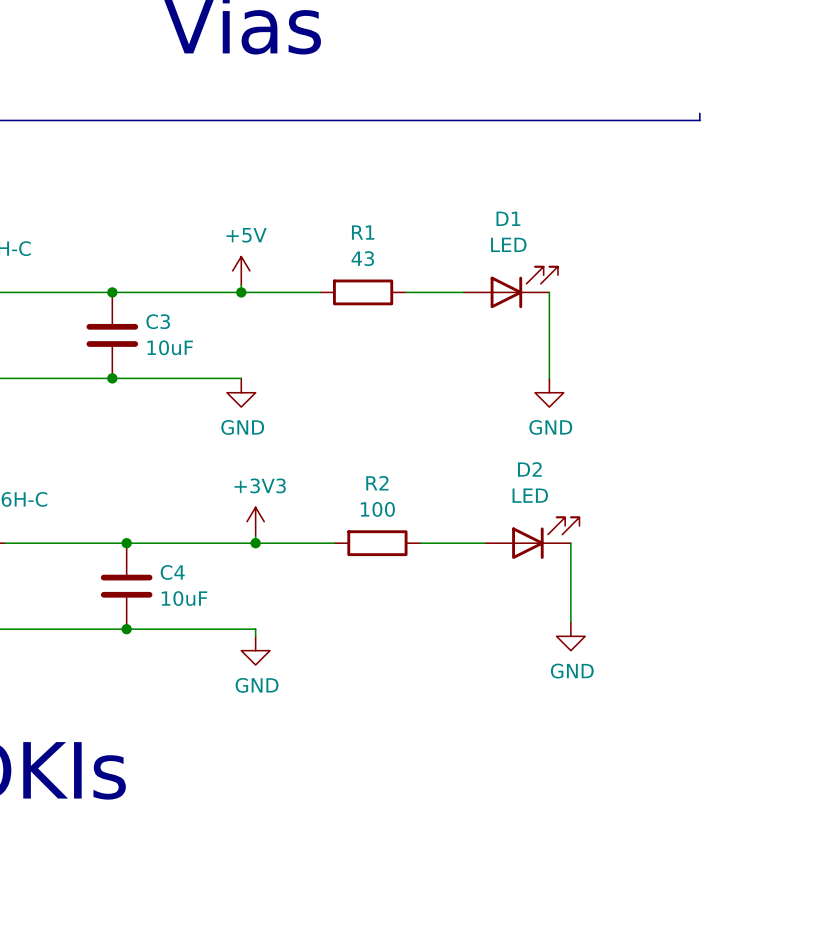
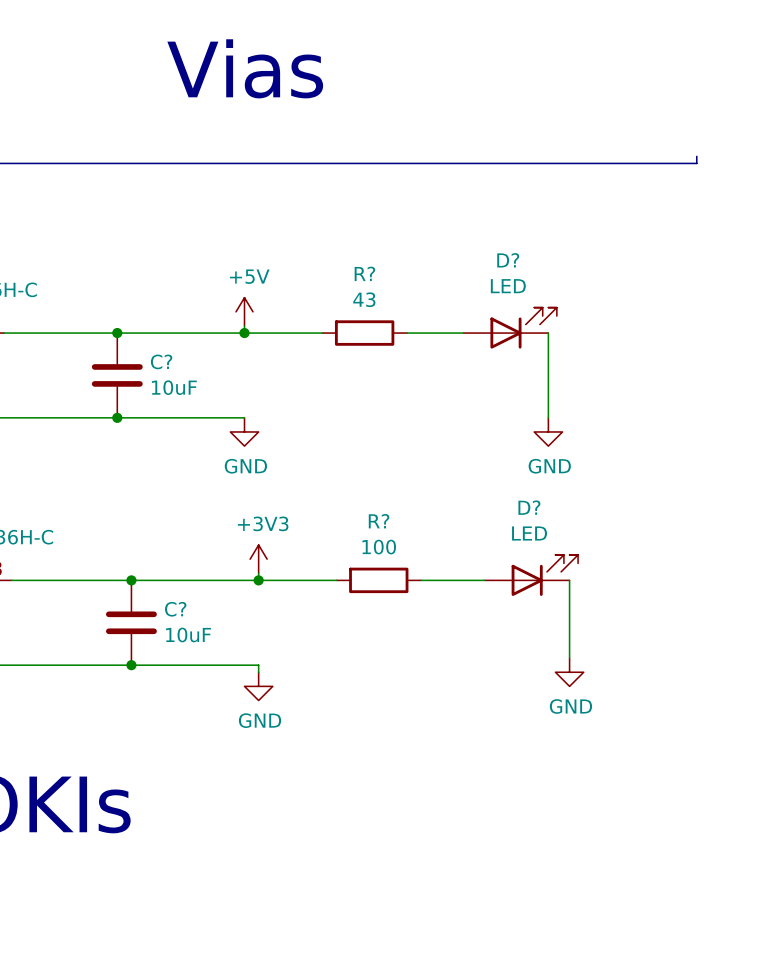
D1 name: D1 (508, 218) -> D? (508, 260)
R1 name: R1 (363, 232) -> R? (364, 273)
C3 name: C3 (158, 321) -> C? (161, 361)
D2 name: D2 (529, 469) -> D? (529, 507)
R2 name: R2 (377, 483) -> R? (379, 521)
C4 name: C4 (172, 572) -> C? (175, 609)

